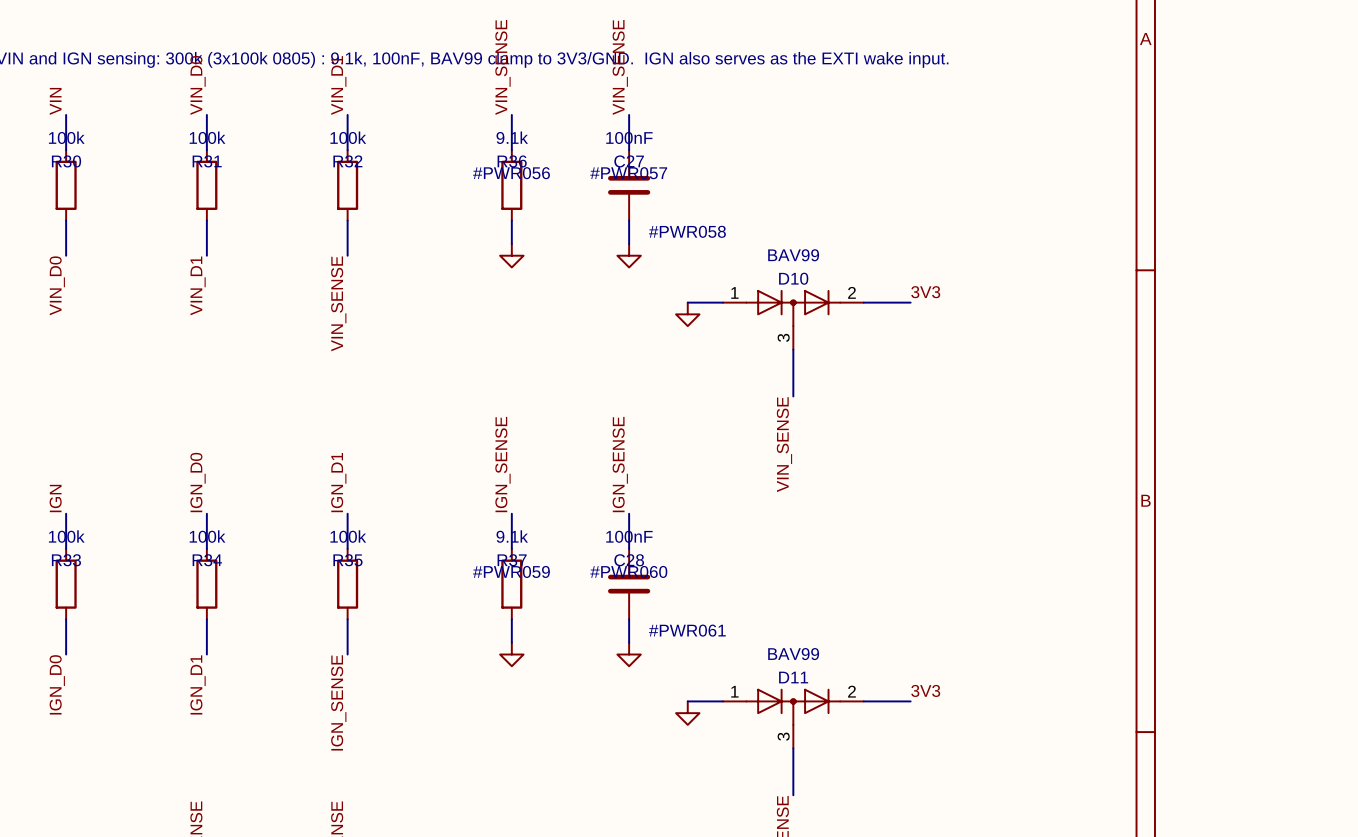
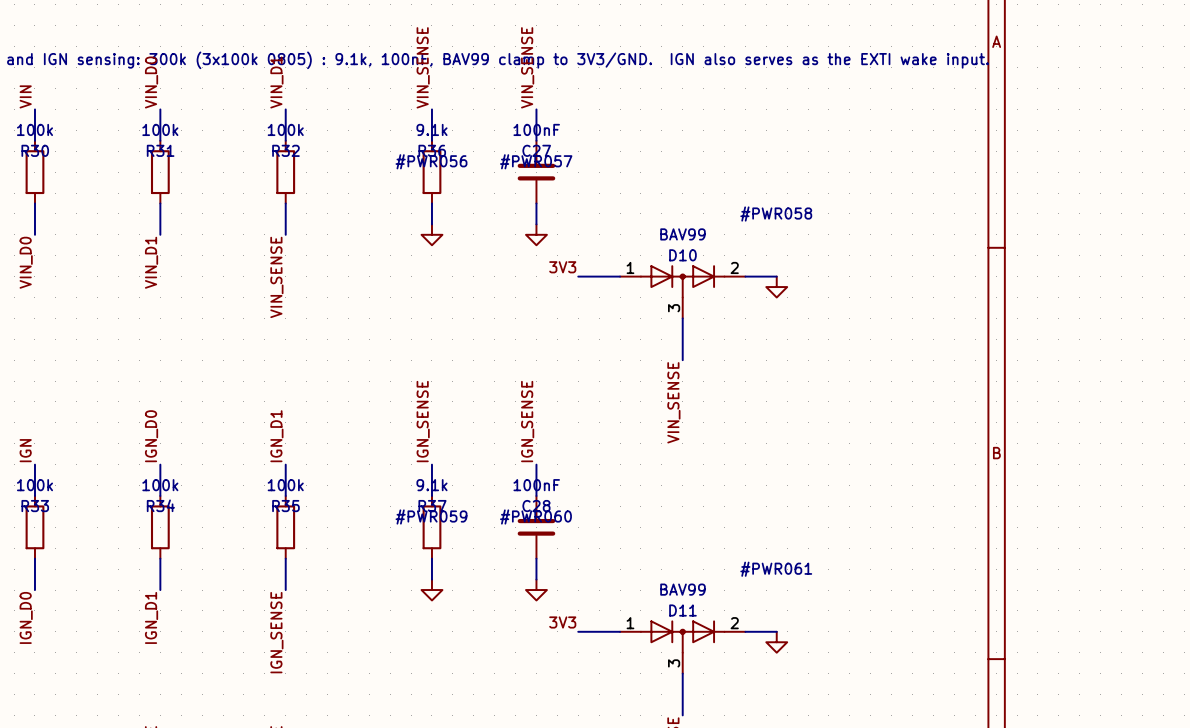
label: none -> 3V3 (562, 267)
label: 3V3 (925, 292) -> none
wire: (898, 302) (910, 302) -> (578, 276) (588, 276)
#PWR058 position: (687, 314) -> (776, 287)
label: none -> 3V3 (562, 622)
label: 3V3 (925, 690) -> none
wire: (898, 701) (910, 701) -> (578, 631) (588, 631)
#PWR061 position: (687, 713) -> (776, 642)

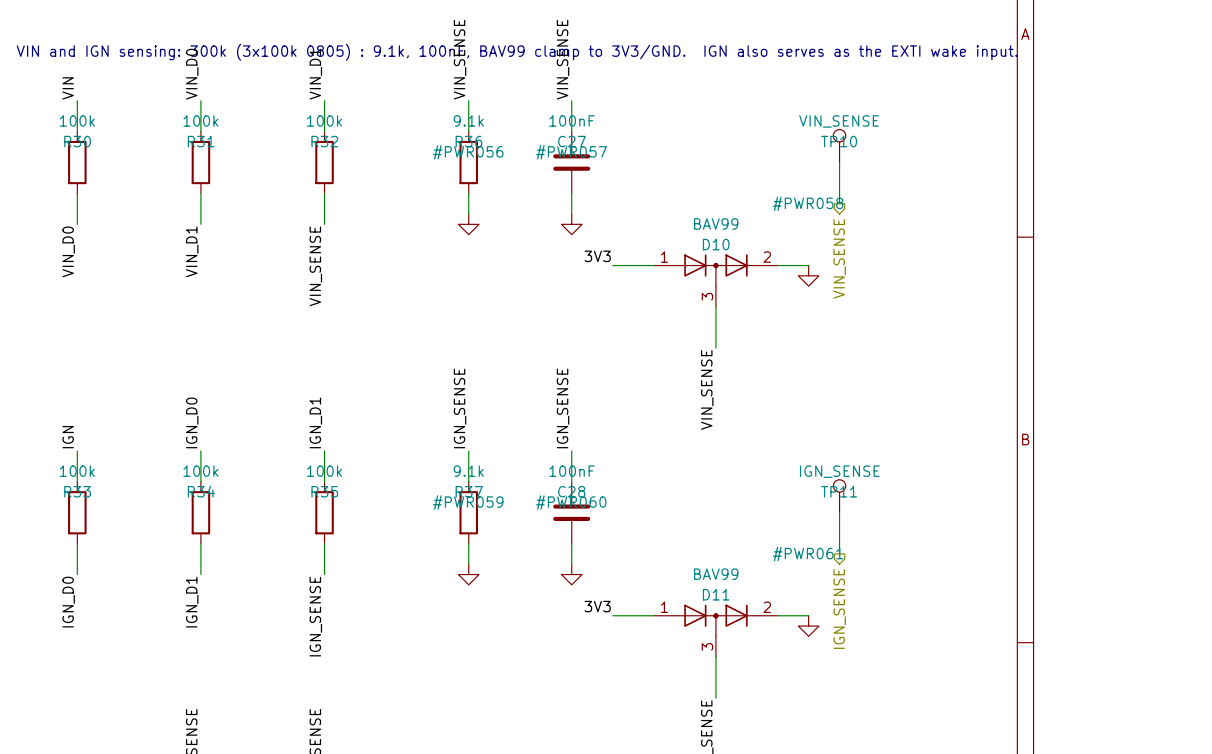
TP10: none -> VIN_SENSE (839, 146)
wire: none -> (839, 162) (839, 203)
hierarchical label: none -> VIN_SENSE (839, 258)
TP11: none -> IGN_SENSE (839, 496)
wire: none -> (839, 512) (839, 553)
hierarchical label: none -> IGN_SENSE (839, 609)

